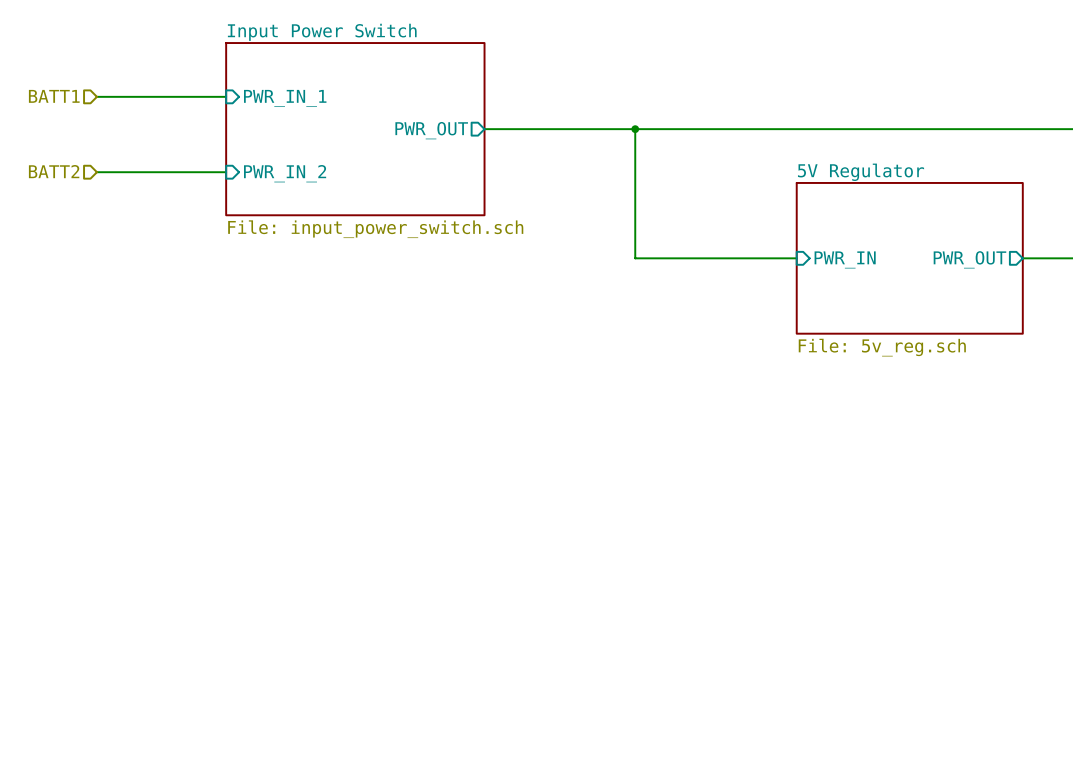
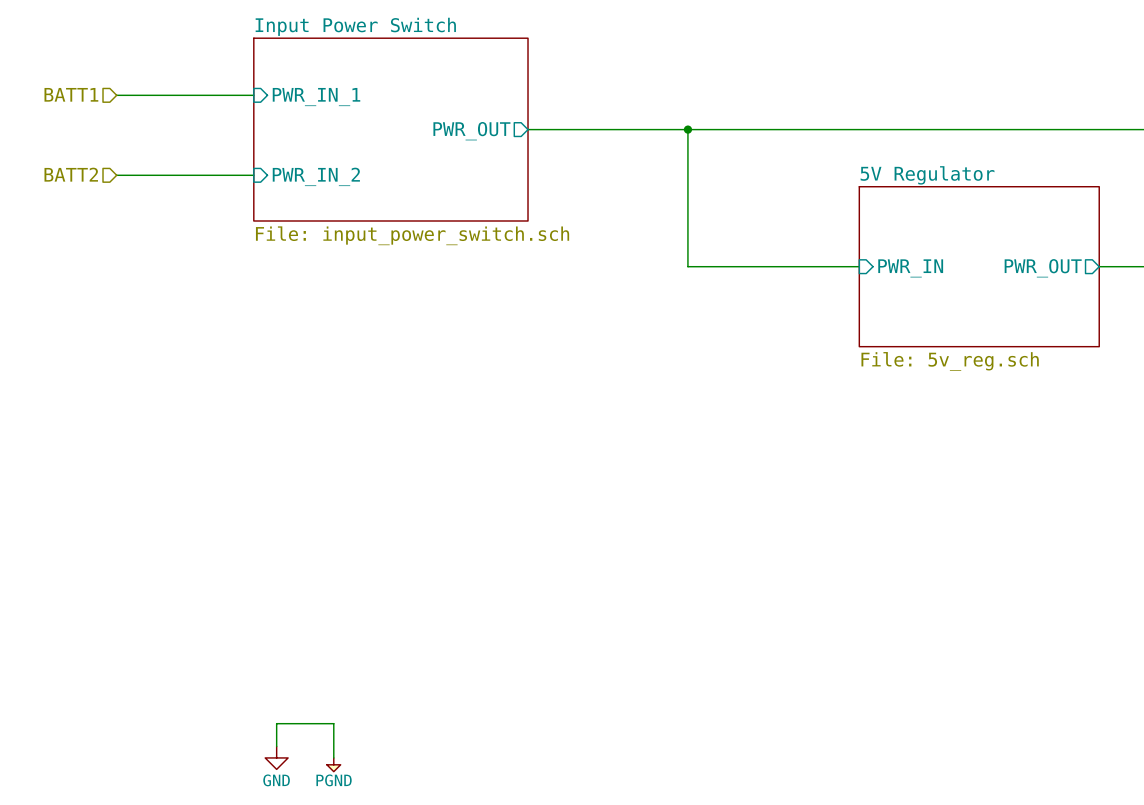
wire: none -> (276, 746) (276, 723) (333, 723) (333, 757)
power symbol: none -> GND (276, 757)
power symbol: none -> PGND (333, 764)

